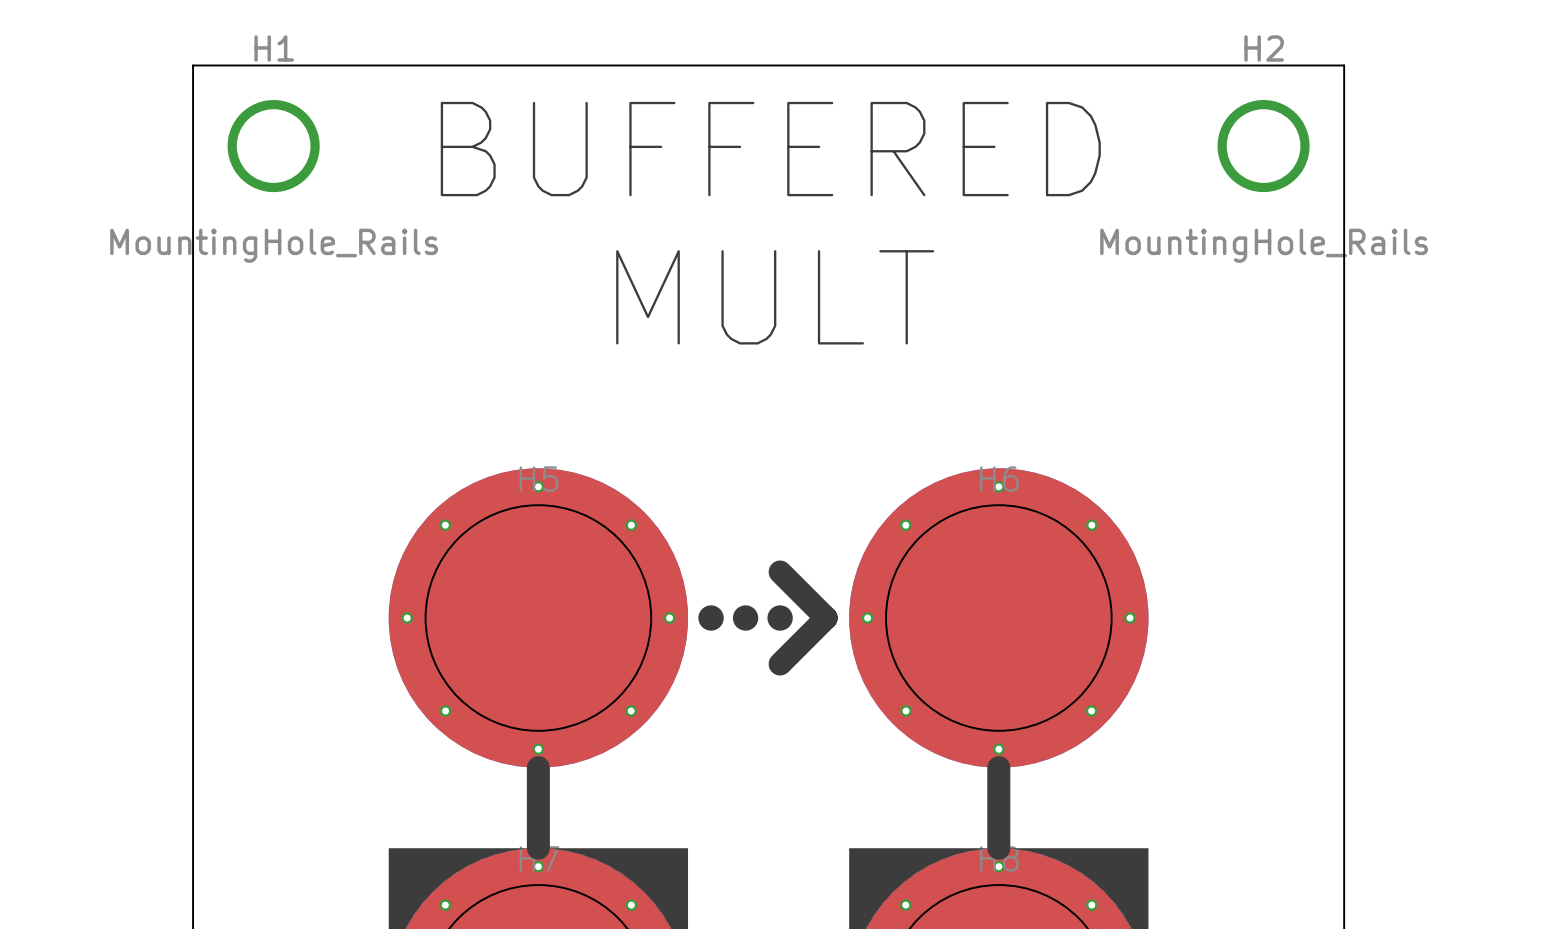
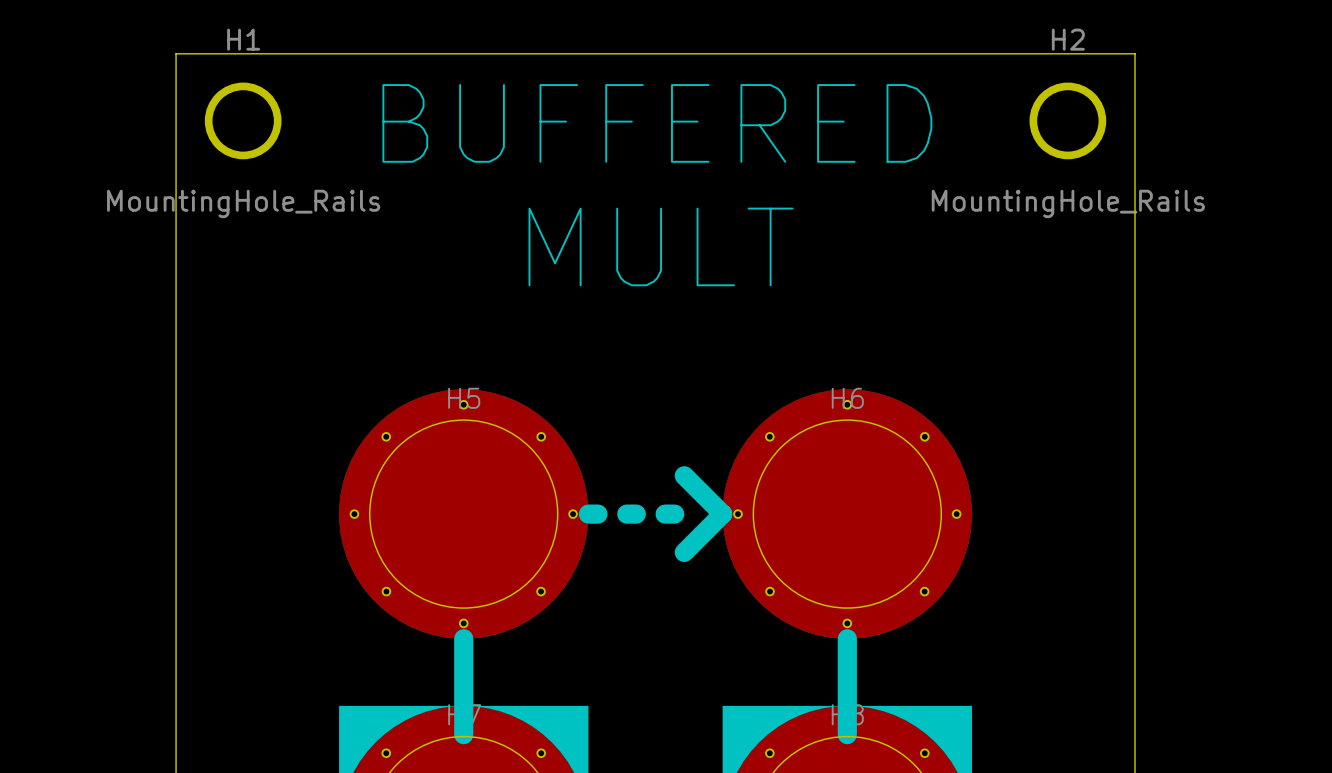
line: (780, 571) (826, 618) (780, 664) -> (684, 475) (722, 514) (684, 552)
drawing: [698, 605, 793, 631] -> none
line: none -> (588, 514) (597, 514)
line: none -> (626, 514) (636, 514)
line: none -> (665, 514) (674, 514)
line: none -> (463, 705) (463, 734)
line: none -> (847, 705) (847, 734)

